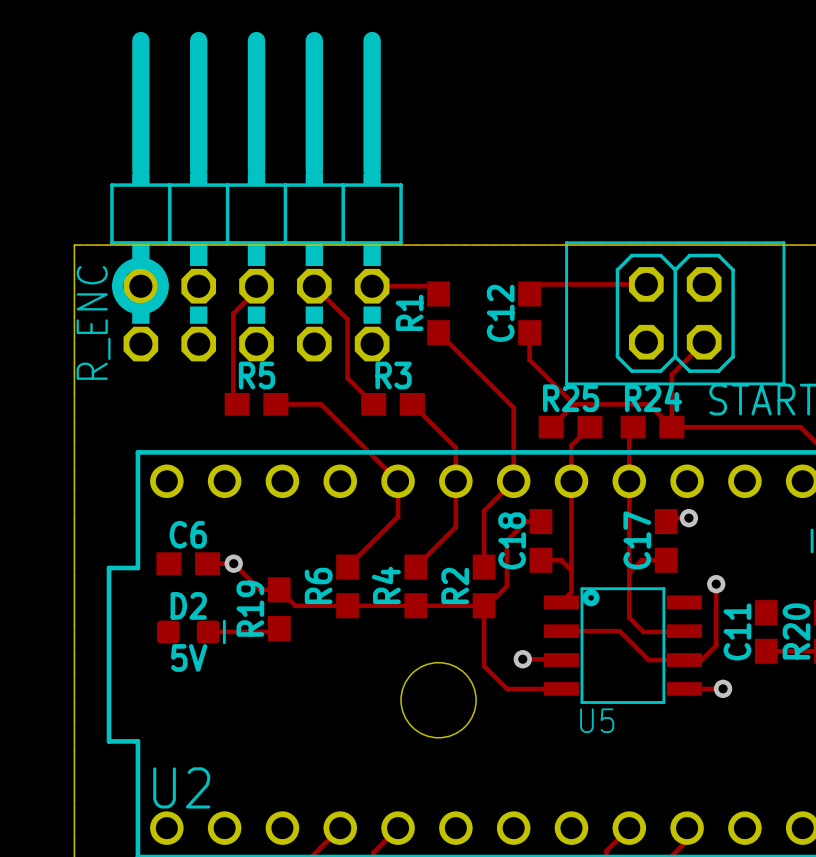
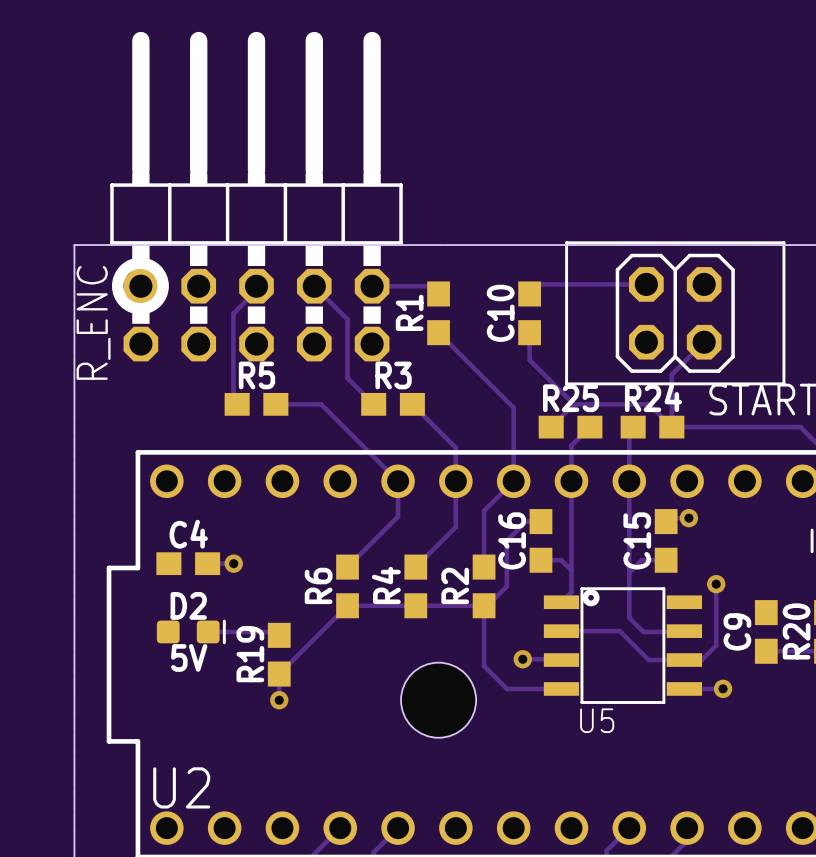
C12 name: C12 (500, 313) -> C10 (500, 313)
C6 name: C6 (188, 534) -> C4 (188, 534)
C18 name: C18 (512, 540) -> C16 (512, 540)
C17 name: C17 (637, 540) -> C15 (637, 540)
track: (233, 563) (259, 589) (279, 589) (295, 605) (347, 605) -> (279, 700) (279, 674) (347, 605)
R19 position: (279, 609) -> (279, 654)
C11 name: C11 (737, 631) -> C9 (737, 631)
via: none -> (279, 700)

